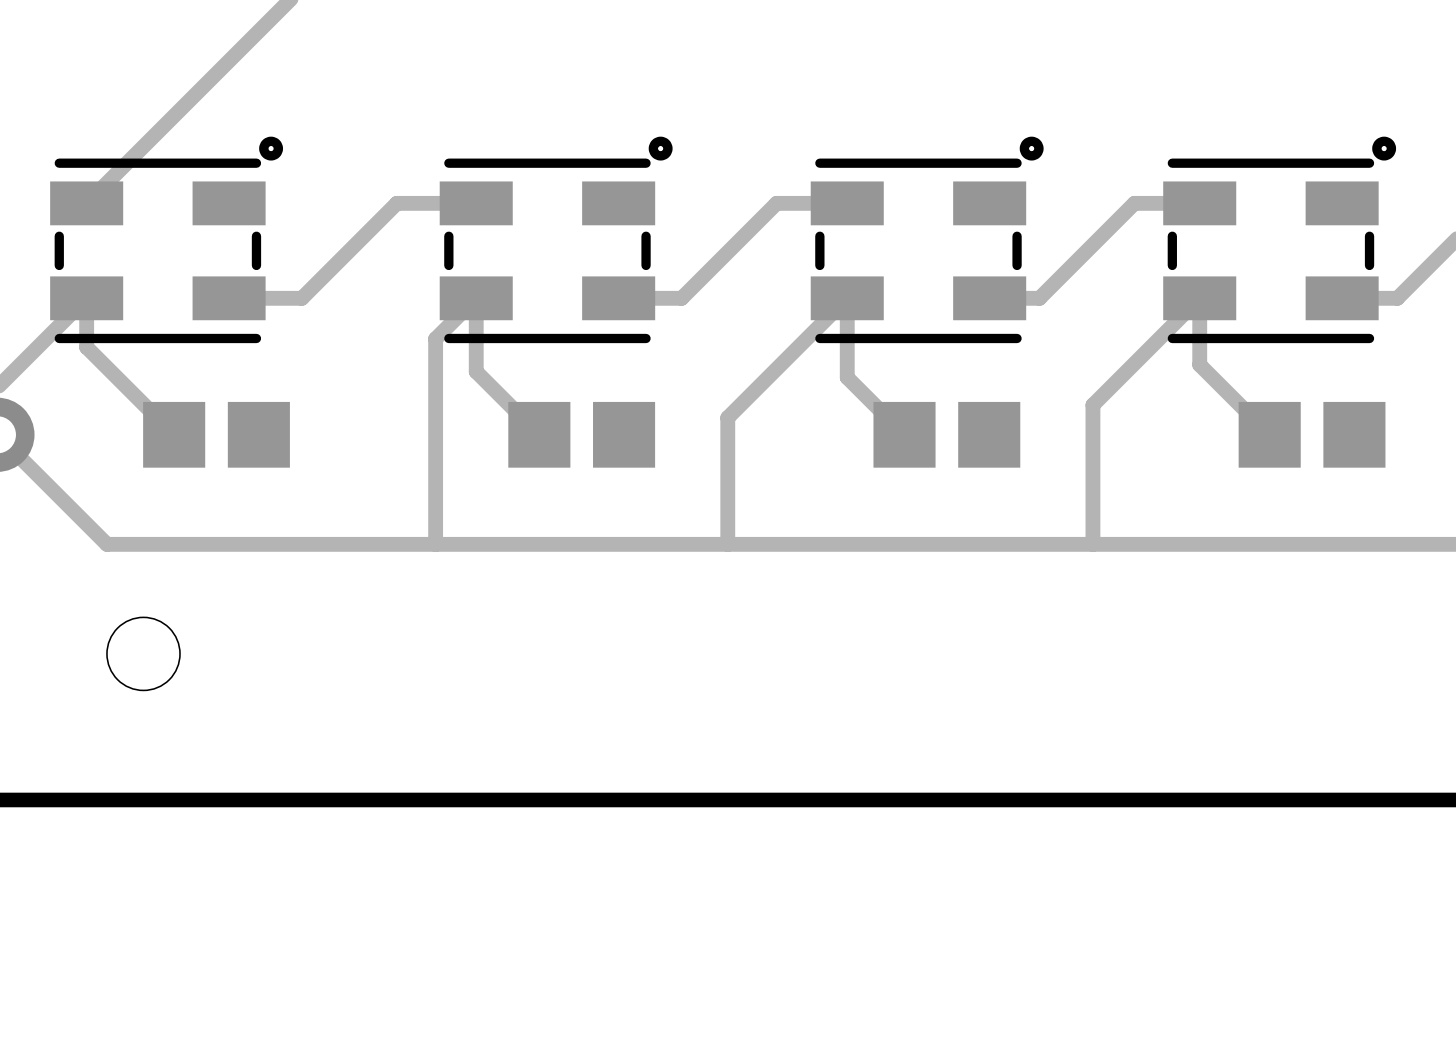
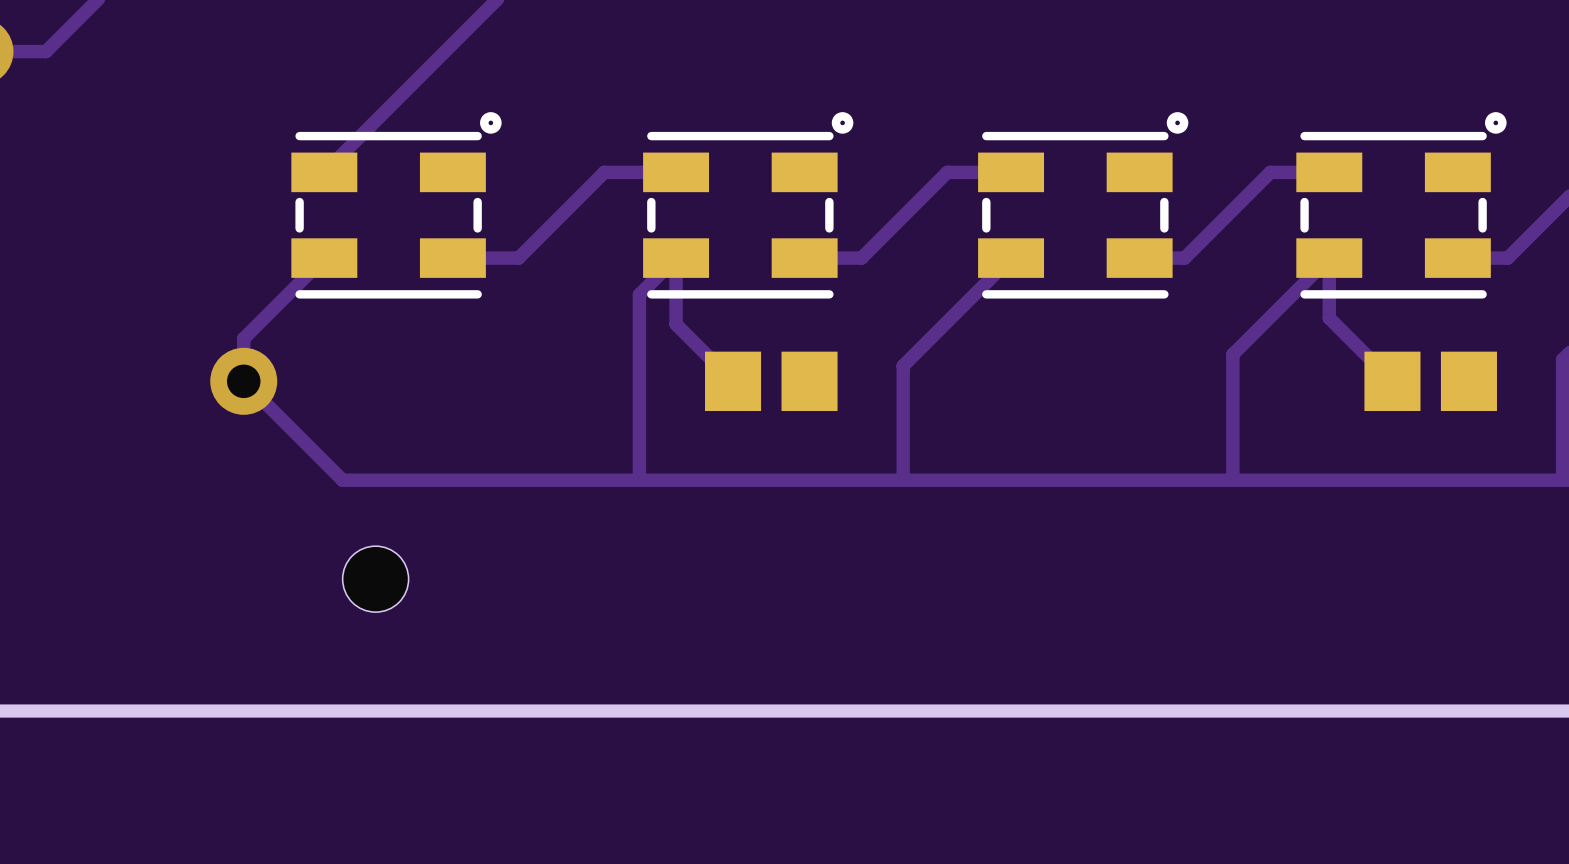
track: (86, 298) (86, 347) (174, 434) -> none
track: (847, 298) (847, 377) (904, 434) -> none
part: (216, 434) -> none
part: (946, 434) -> none

